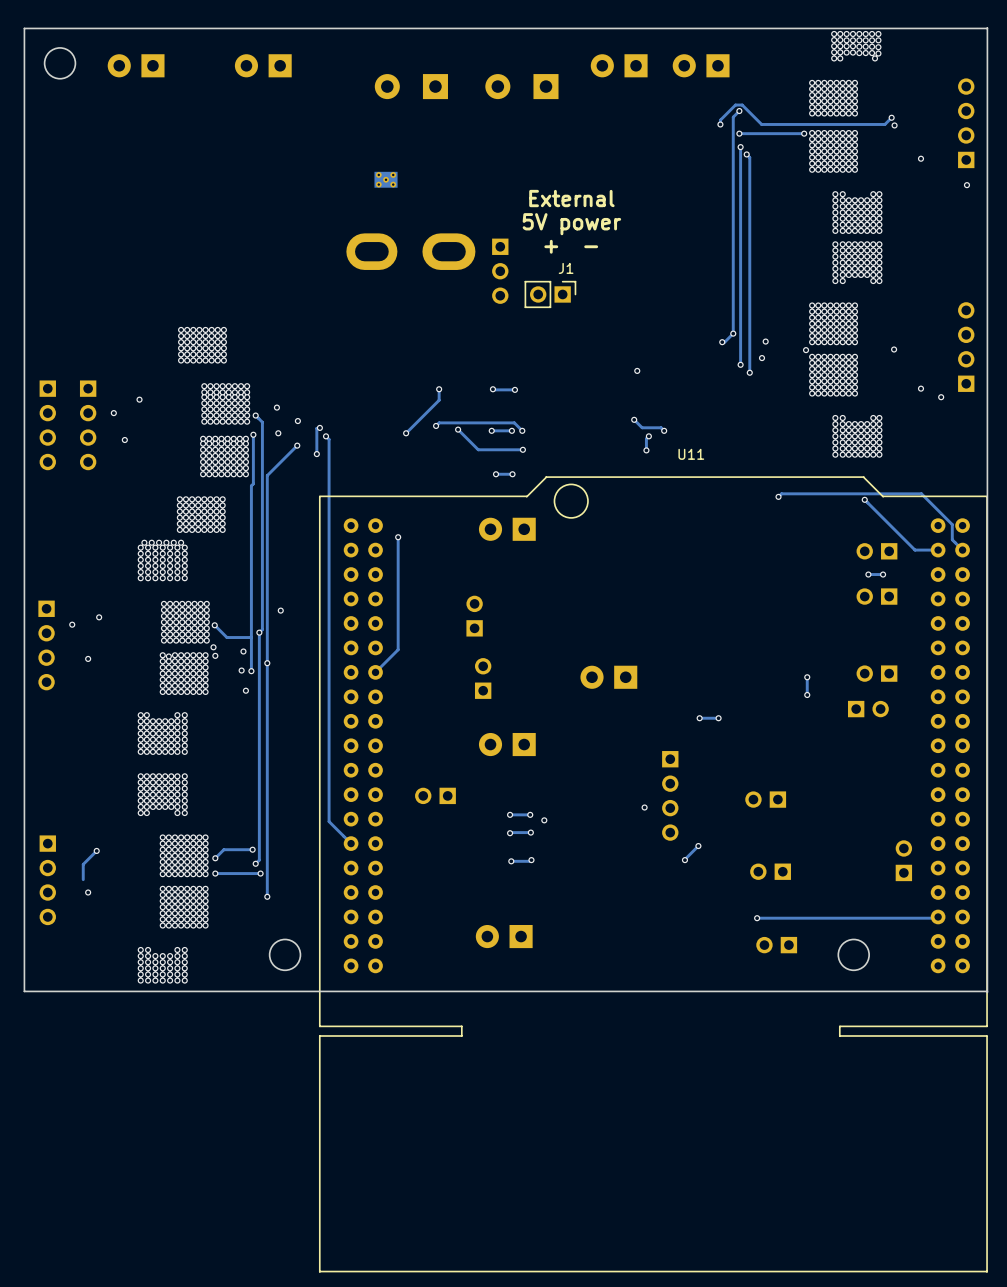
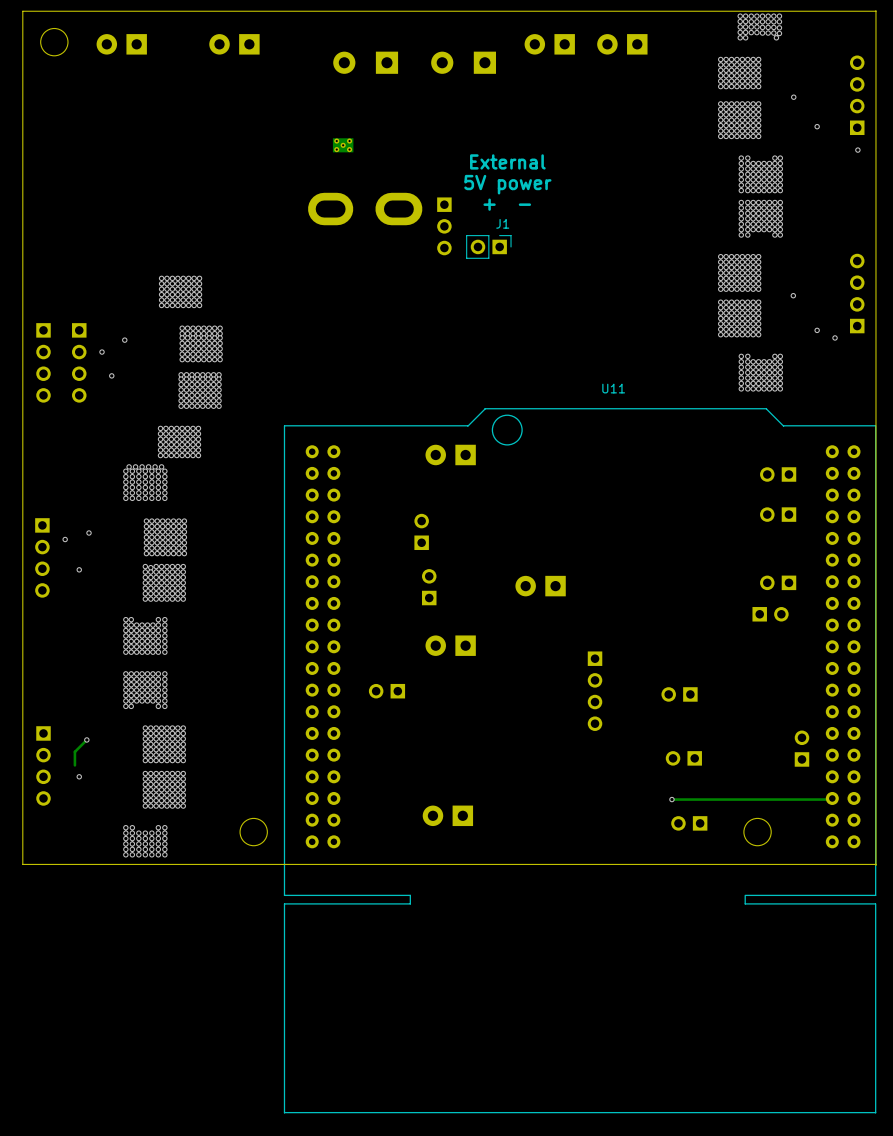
track: (739, 111) (733, 117) (733, 333) (724, 342) (722, 342) -> none
via: (739, 111) -> none
track: (891, 117) (884, 124) (761, 124) (742, 105) (735, 105) (720, 120) (720, 124) -> none
via: (891, 117) -> none
via: (720, 124) -> none
via: (739, 133) -> none
track: (804, 133) (739, 133) -> none
via: (804, 133) -> none
track: (740, 147) (740, 364) -> none
via: (740, 147) -> none
track: (746, 154) (749, 157) (749, 372) -> none
via: (746, 154) -> none
via: (733, 333) -> none
via: (765, 341) -> none
via: (722, 342) -> none
via: (806, 350) -> none
via: (762, 358) -> none
via: (740, 364) -> none
via: (637, 370) -> none
via: (749, 372) -> none
track: (439, 389) (439, 400) (406, 433) -> none
via: (439, 389) -> none
track: (492, 389) (514, 389) -> none
via: (492, 389) -> none
via: (514, 389) -> none
via: (276, 407) -> none
track: (255, 415) (262, 422) (262, 629) (259, 632) (259, 860) (255, 863) -> none
via: (255, 415) -> none
track: (634, 419) (642, 427) (661, 427) (664, 430) -> none
via: (634, 419) -> none
via: (297, 421) -> none
track: (436, 425) (439, 422) (514, 422) (522, 430) -> none
via: (436, 425) -> none
track: (319, 427) (316, 428) (316, 454) -> none
via: (319, 427) -> none
track: (458, 429) (478, 449) (522, 449) -> none
via: (458, 429) -> none
via: (491, 430) -> none
track: (511, 430) (491, 430) -> none
via: (511, 430) -> none
via: (522, 430) -> none
via: (664, 430) -> none
via: (278, 433) -> none
via: (406, 433) -> none
track: (253, 434) (253, 483) (251, 485) (251, 671) -> none
via: (253, 434) -> none
track: (326, 436) (329, 439) (329, 821) (351, 843) -> none
via: (326, 436) -> none
track: (648, 436) (646, 438) (646, 450) -> none
via: (648, 436) -> none
track: (297, 445) (267, 475) (267, 896) -> none
via: (297, 445) -> none
via: (522, 449) -> none
via: (646, 450) -> none
via: (316, 454) -> none
via: (496, 474) -> none
track: (512, 474) (496, 474) -> none
via: (512, 474) -> none
track: (778, 496) (781, 493) (921, 493) (952, 524) (952, 539) (962, 550) -> none
via: (778, 496) -> none
track: (864, 499) (915, 550) (938, 550) -> none
via: (864, 499) -> none
track: (398, 537) (398, 649) (375, 672) -> none
via: (398, 537) -> none
via: (868, 574) -> none
track: (883, 574) (868, 574) -> none
via: (883, 574) -> none
via: (280, 610) -> none
track: (214, 625) (226, 637) (251, 637) -> none
via: (214, 625) -> none
via: (259, 632) -> none
via: (213, 647) -> none
via: (243, 651) -> none
via: (215, 655) -> none
via: (267, 663) -> none
via: (241, 670) -> none
via: (251, 671) -> none
track: (807, 677) (807, 695) -> none
via: (807, 677) -> none
via: (245, 690) -> none
via: (807, 695) -> none
via: (699, 718) -> none
track: (718, 718) (699, 718) -> none
via: (718, 718) -> none
via: (644, 807) -> none
via: (510, 814) -> none
track: (530, 814) (510, 814) -> none
via: (530, 814) -> none
via: (544, 820) -> none
track: (530, 832) (510, 833) -> none
via: (530, 832) -> none
via: (510, 833) -> none
track: (698, 846) (684, 860) -> none
via: (698, 846) -> none
track: (252, 849) (223, 849) (215, 858) -> none
via: (252, 849) -> none
via: (215, 858) -> none
track: (531, 860) (511, 861) -> none
via: (531, 860) -> none
via: (684, 860) -> none
via: (511, 861) -> none
via: (255, 863) -> none
via: (215, 873) -> none
track: (260, 873) (215, 873) -> none
via: (260, 873) -> none
via: (267, 896) -> none

